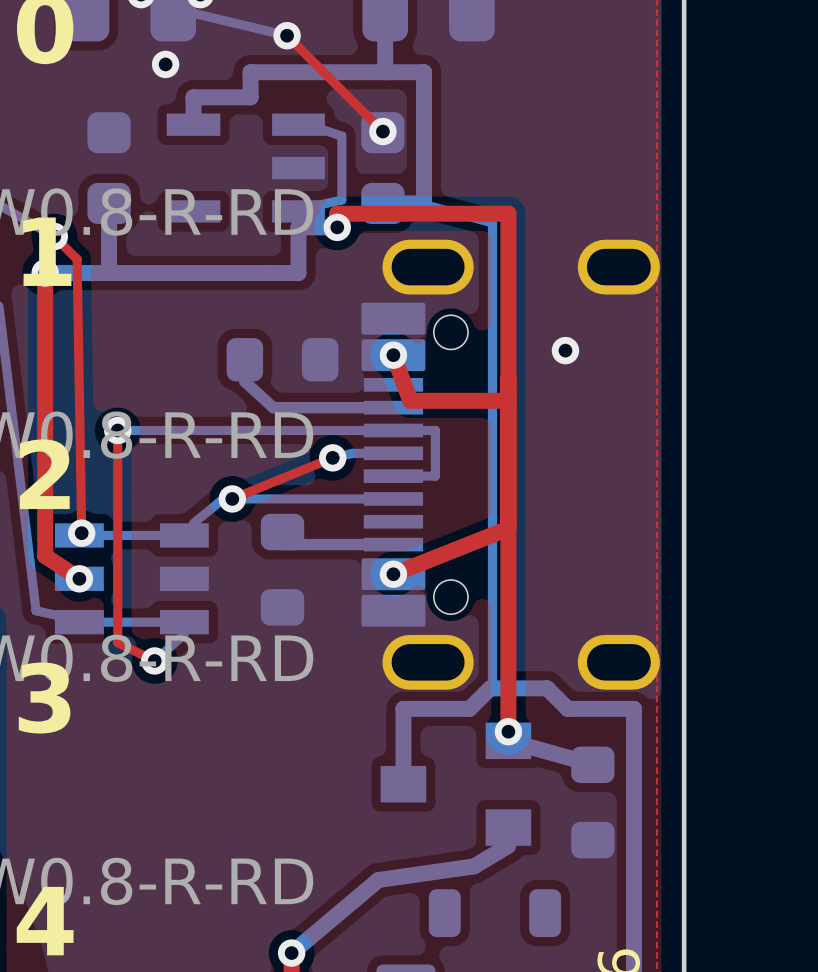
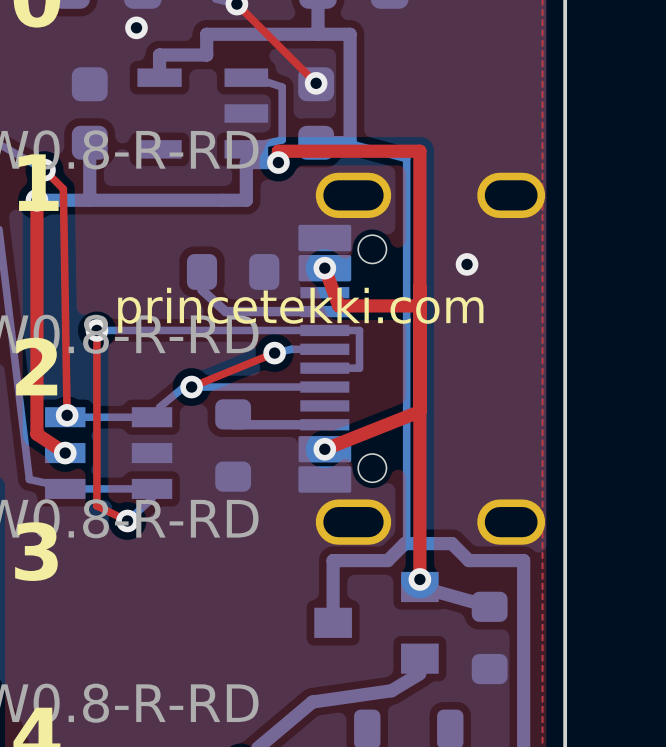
text: none -> princetekki.com (300, 310)

